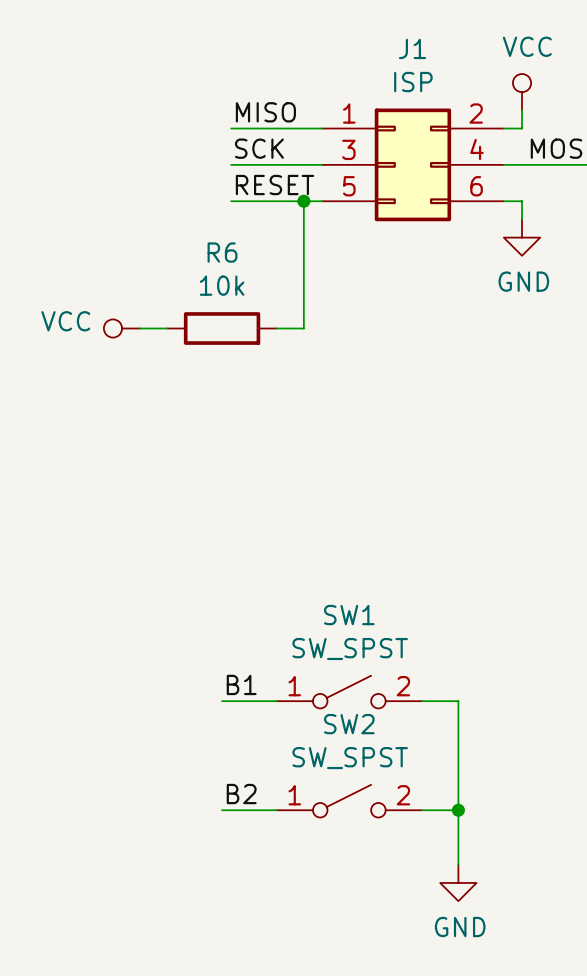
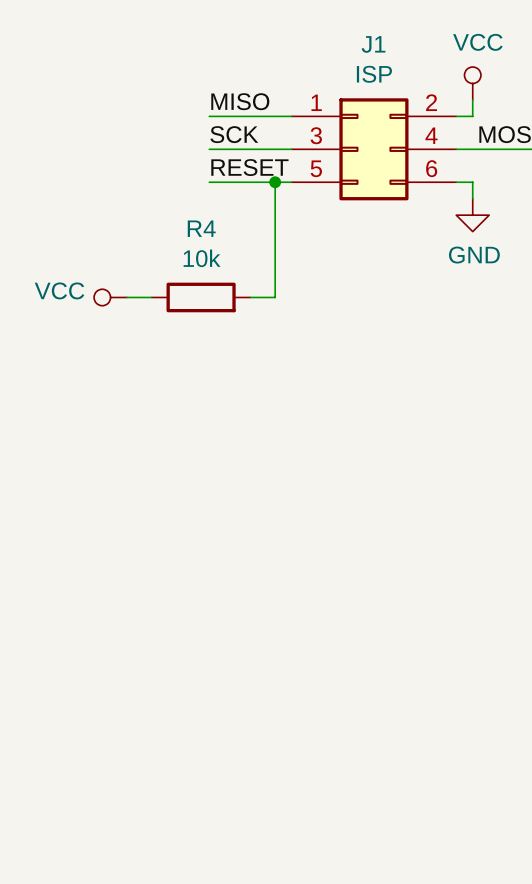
R6 name: R6 (222, 252) -> R4 (201, 228)
label: B1 (241, 684) -> none
SW1: SW_SPST (349, 692) -> none
wire: (222, 701) (276, 701) -> none
wire: (422, 701) (458, 701) (458, 864) -> none
label: B2 (241, 794) -> none
SW2: SW_SPST (349, 801) -> none
wire: (222, 810) (276, 810) -> none
wire: (422, 810) (458, 810) -> none
junction: (458, 810) -> none
power symbol: GND (458, 882) -> none

